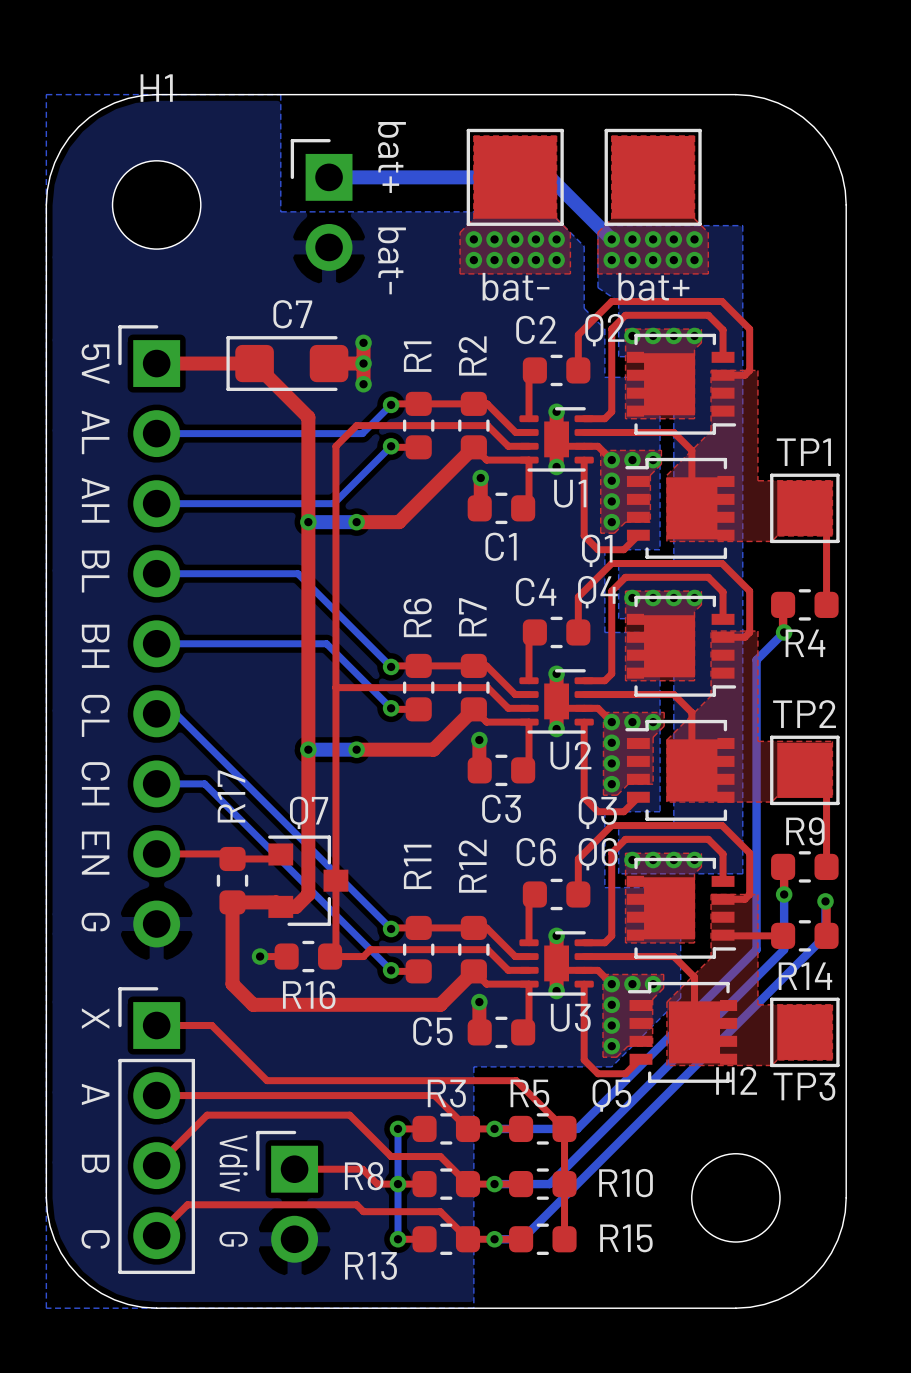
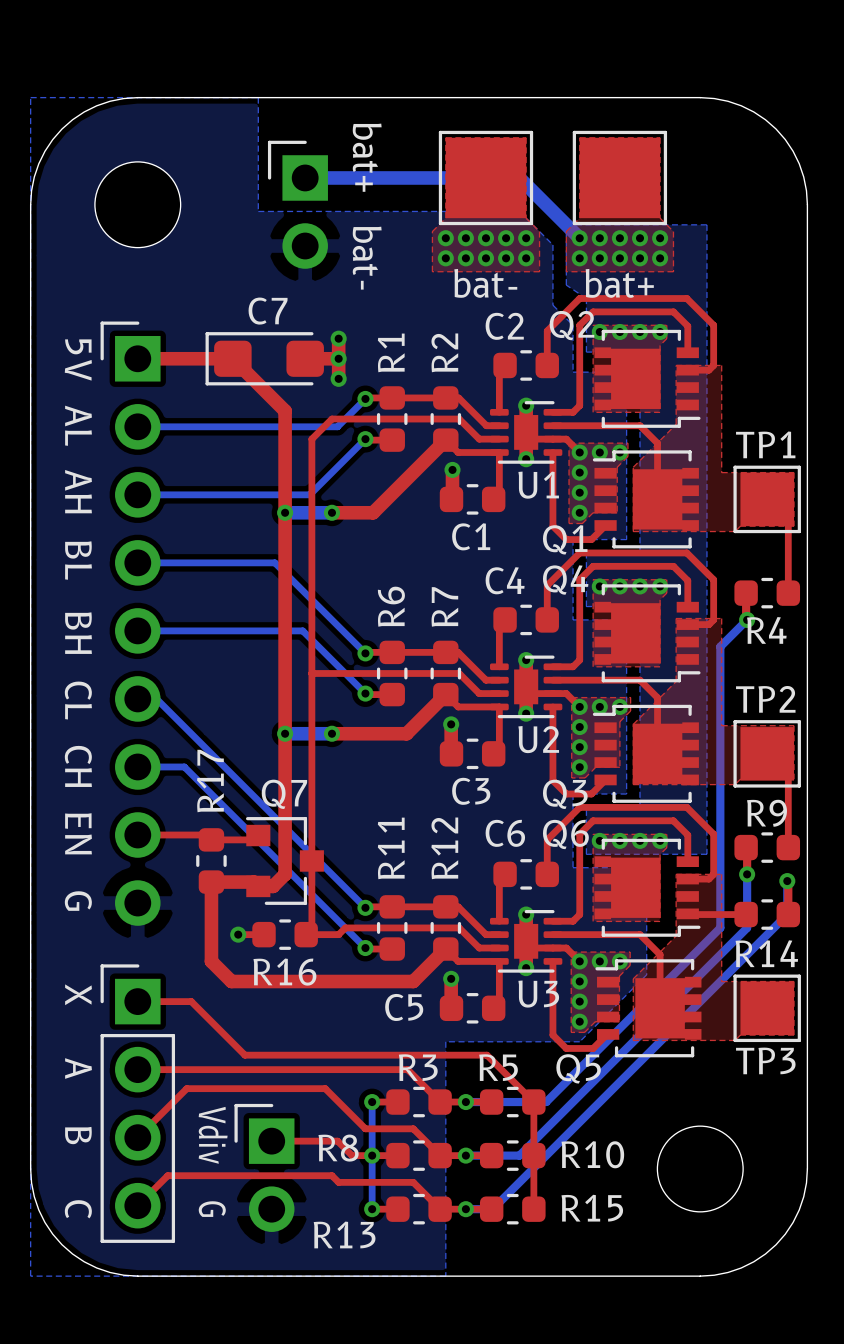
H1 name: H1 (156, 88) -> none
H2 name: H2 (736, 1080) -> none

